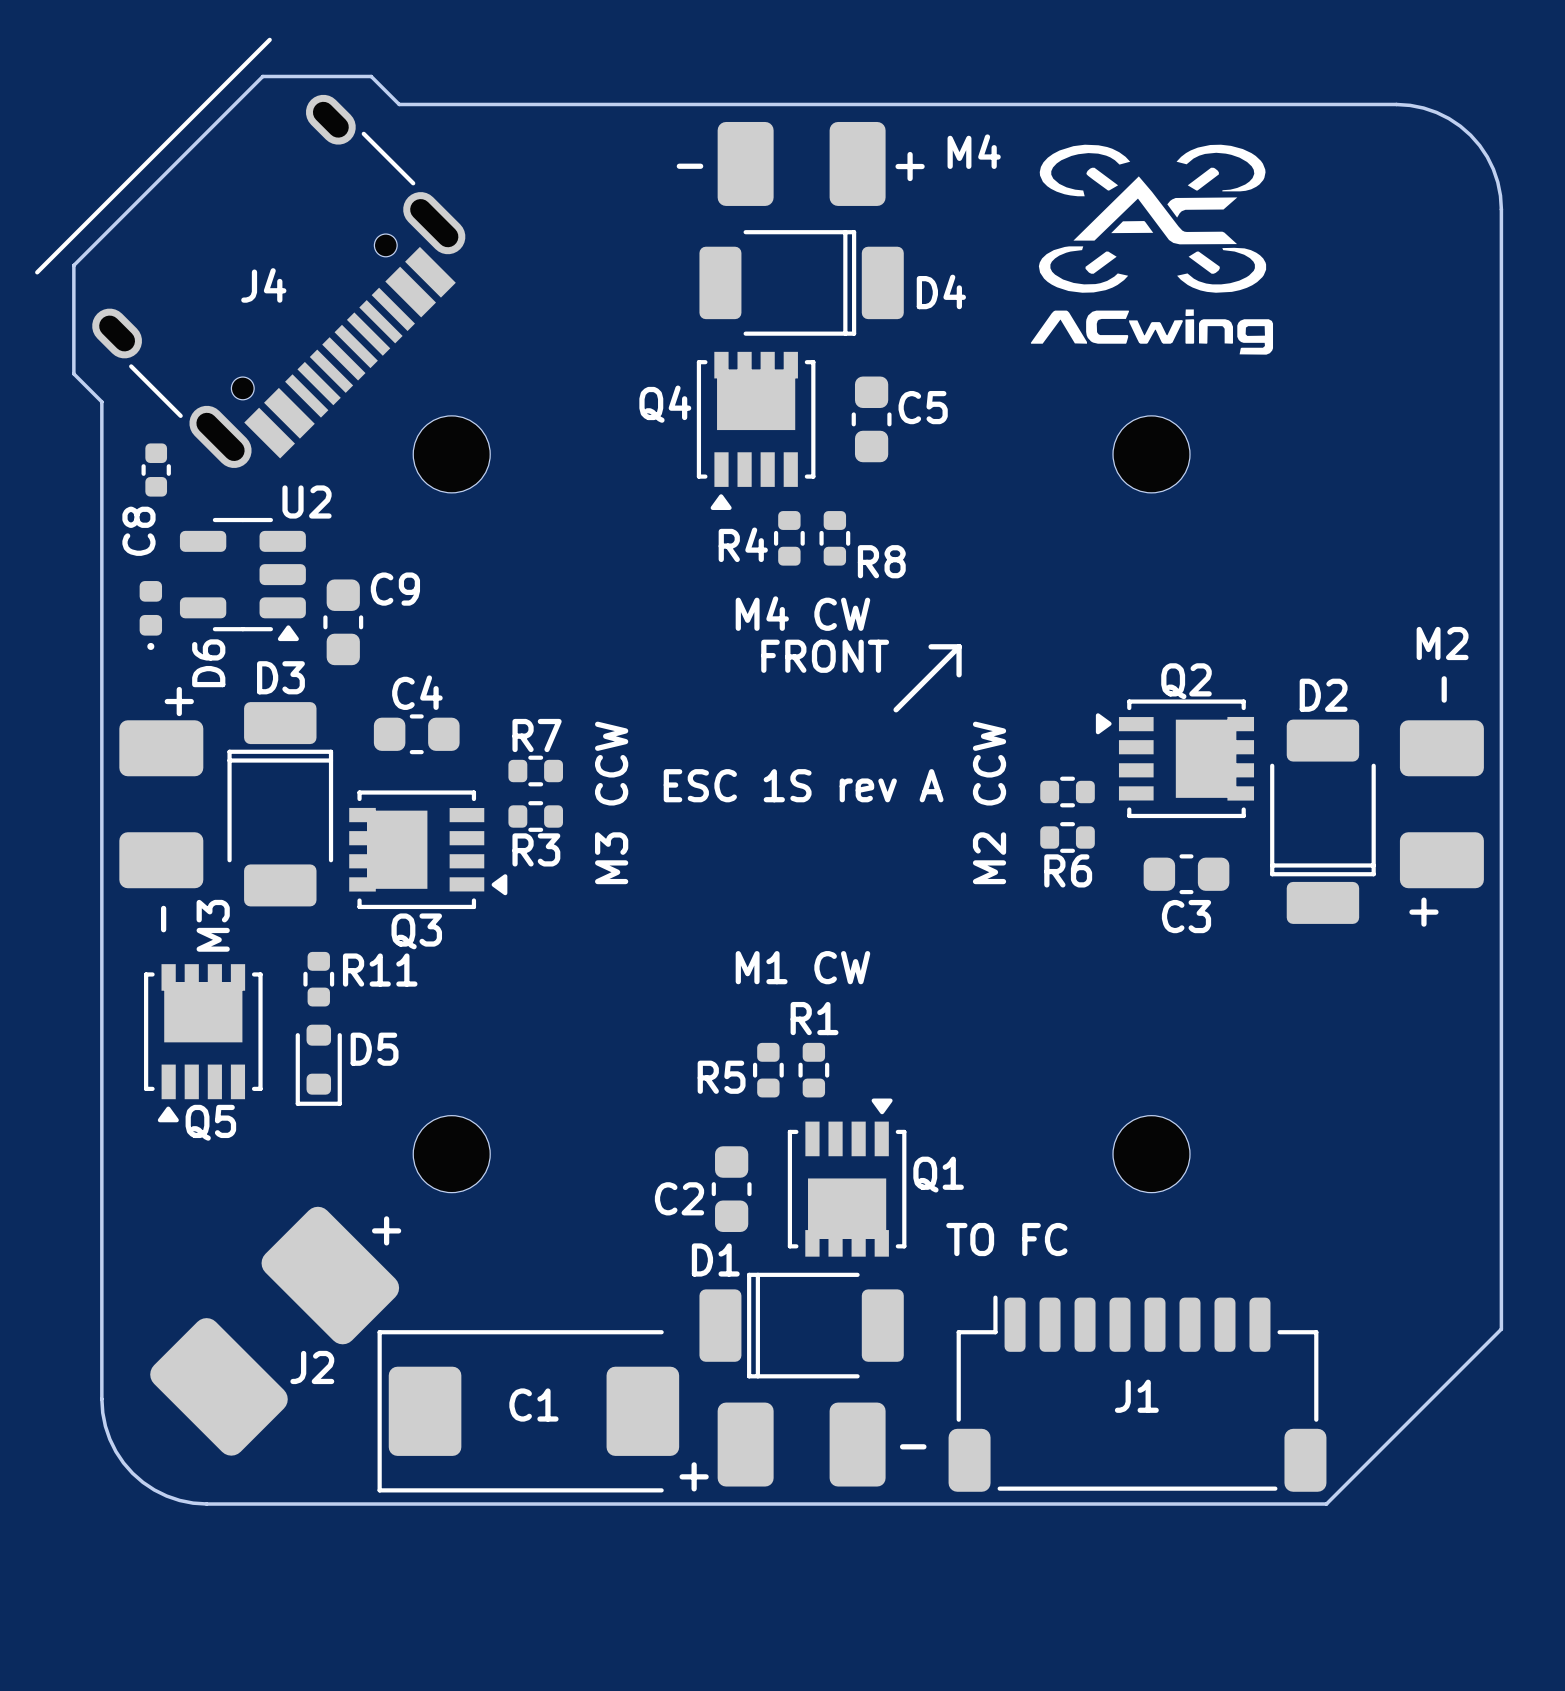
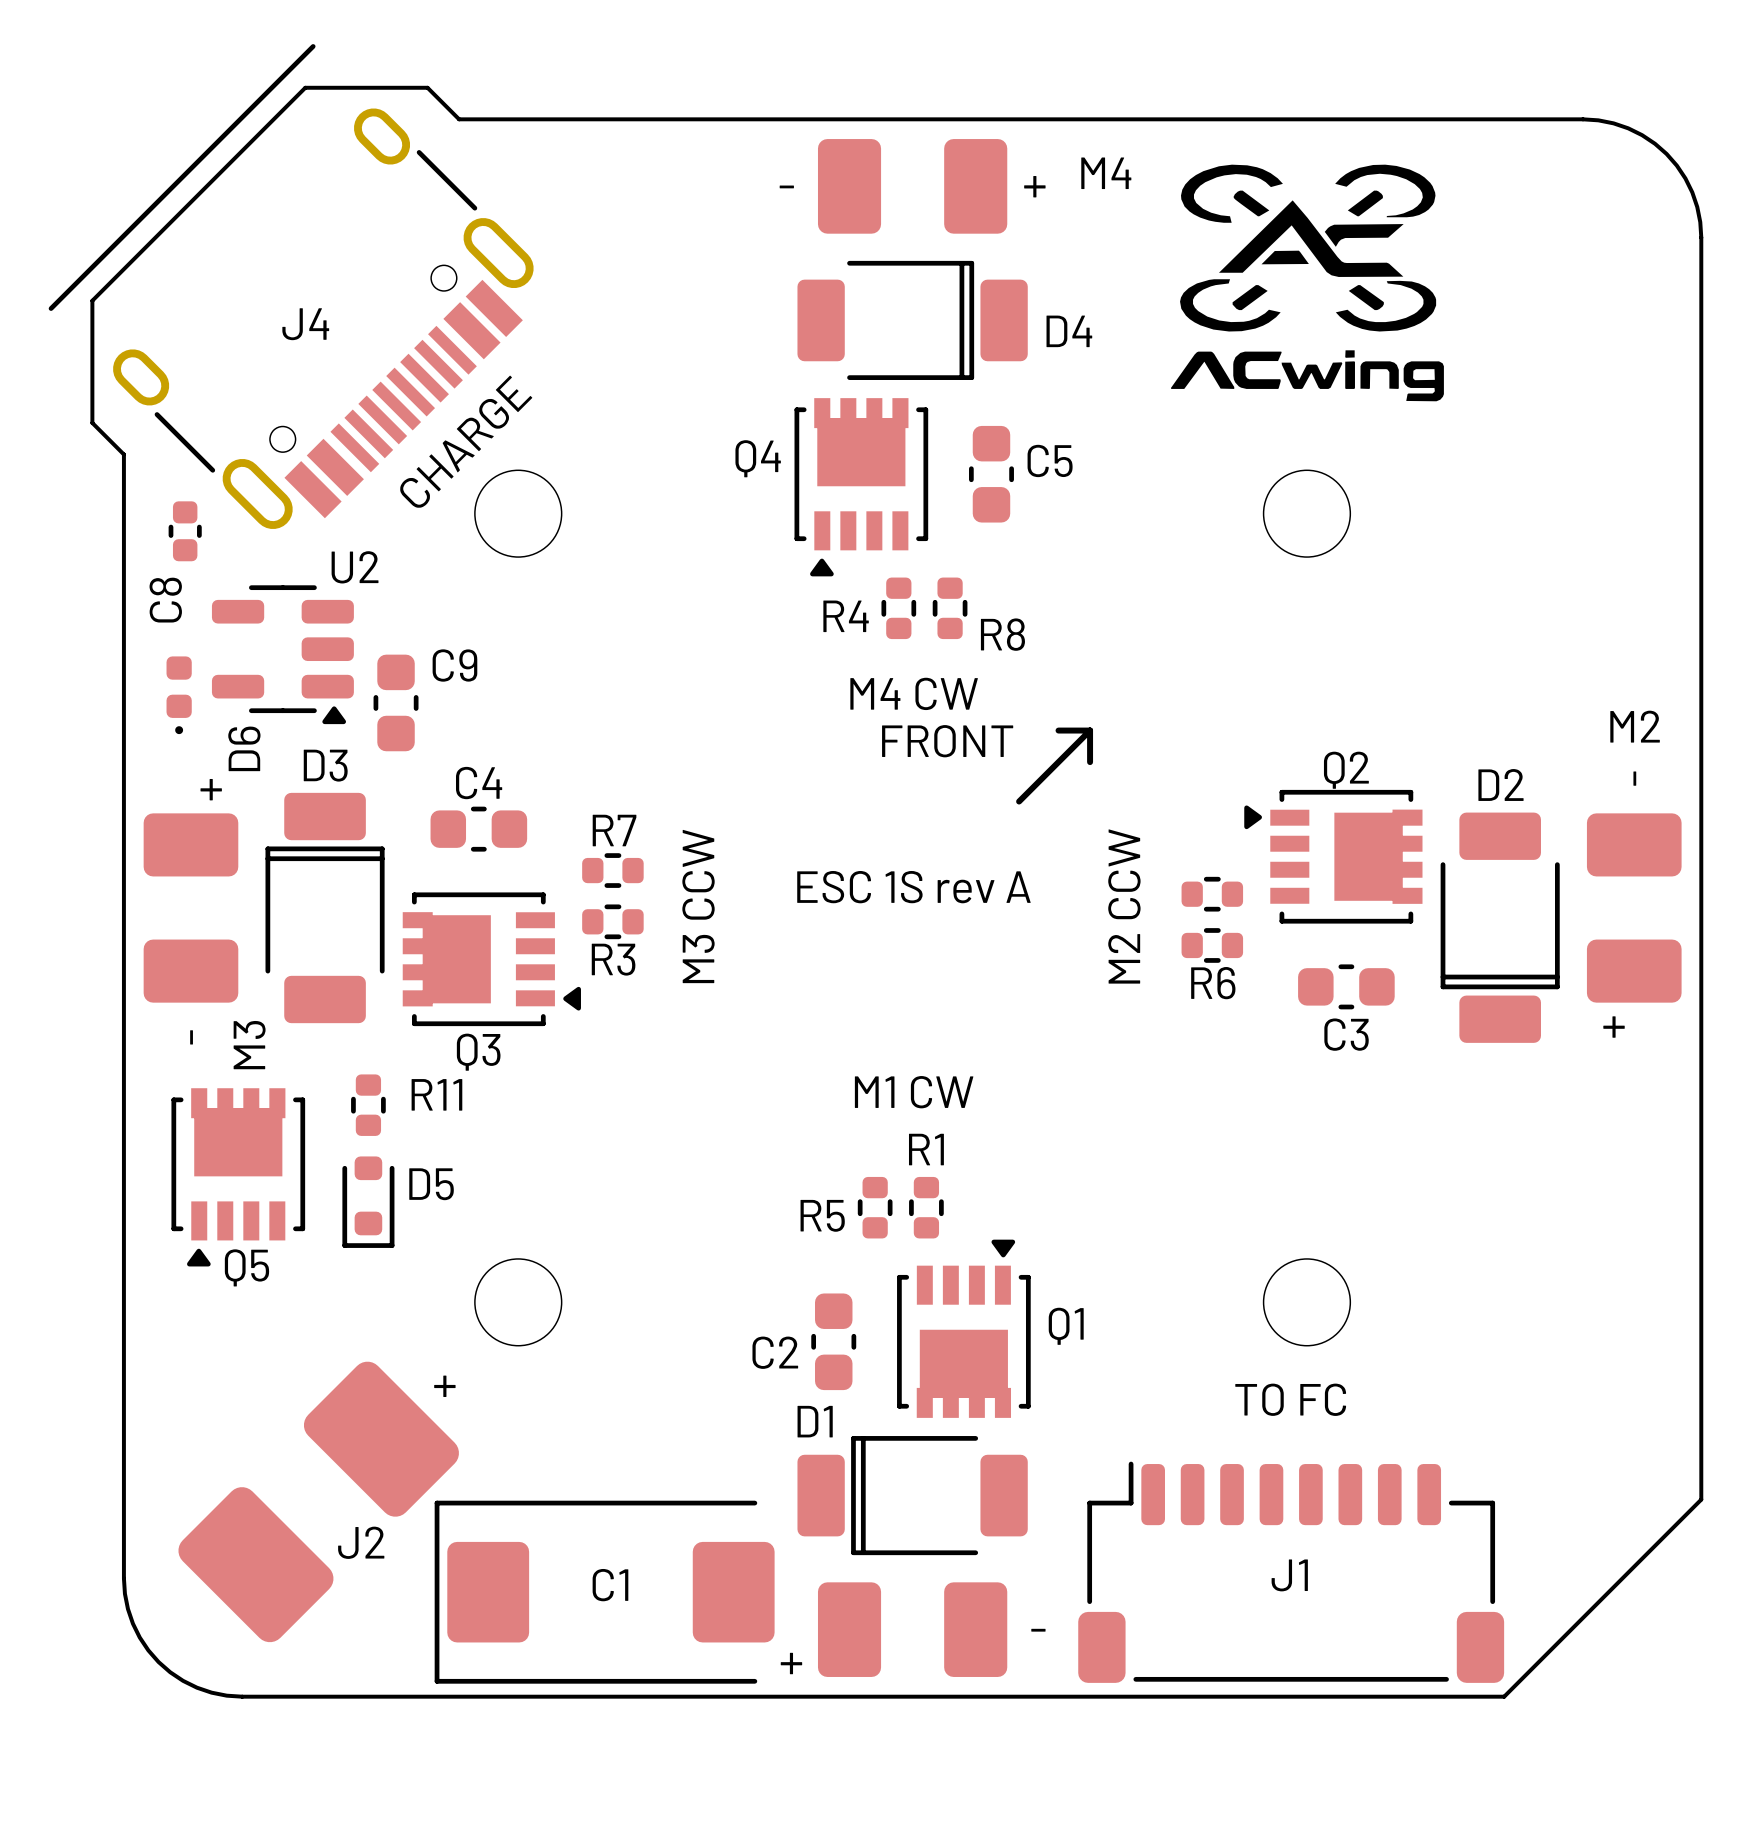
text: none -> CHARGE (466, 441)
text position: TO FC (1006, 1239) -> TO FC (1290, 1399)

